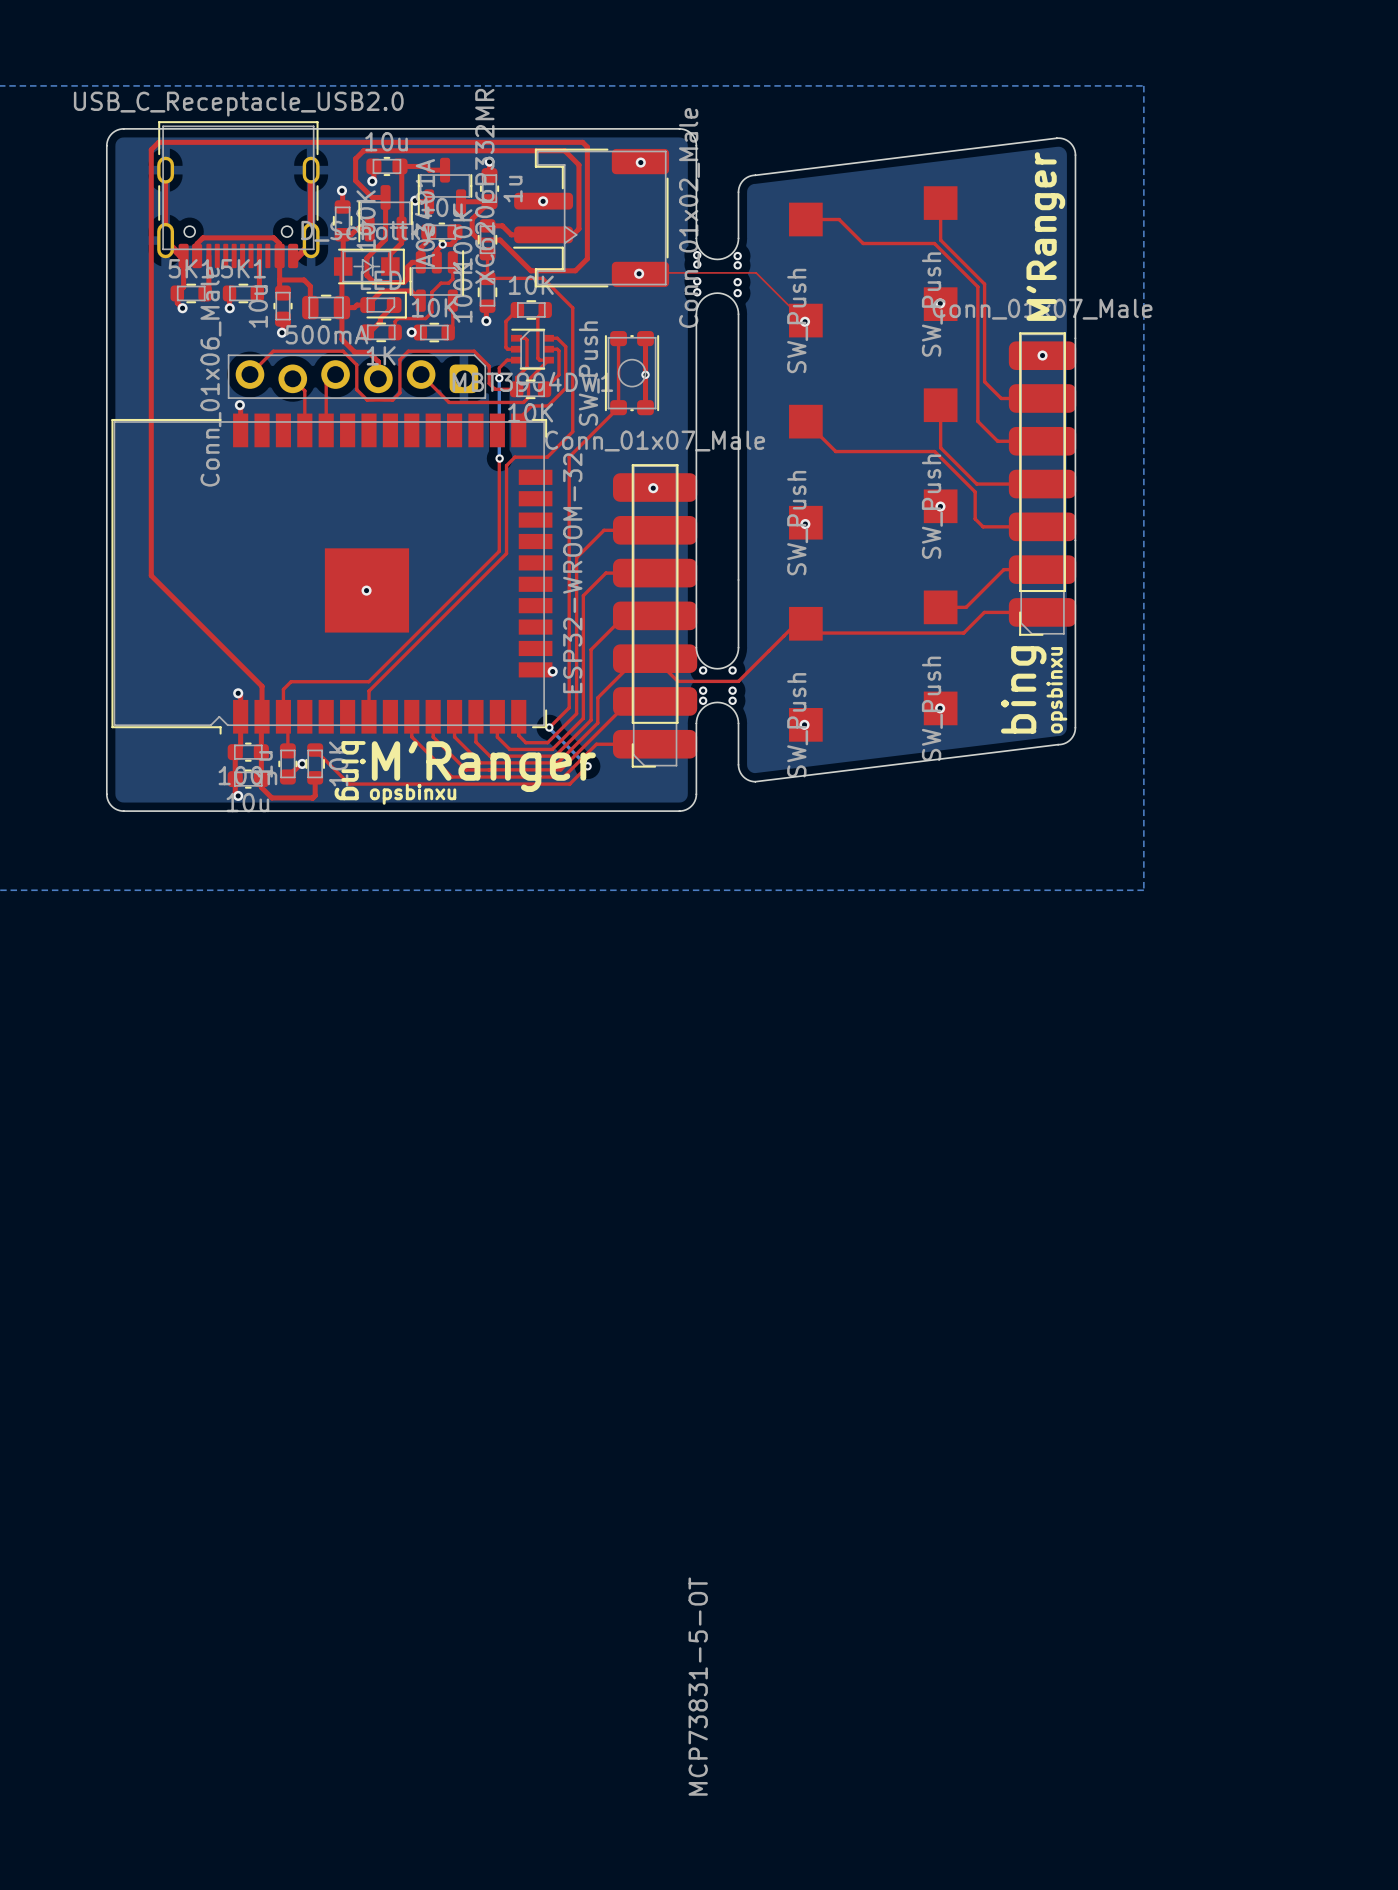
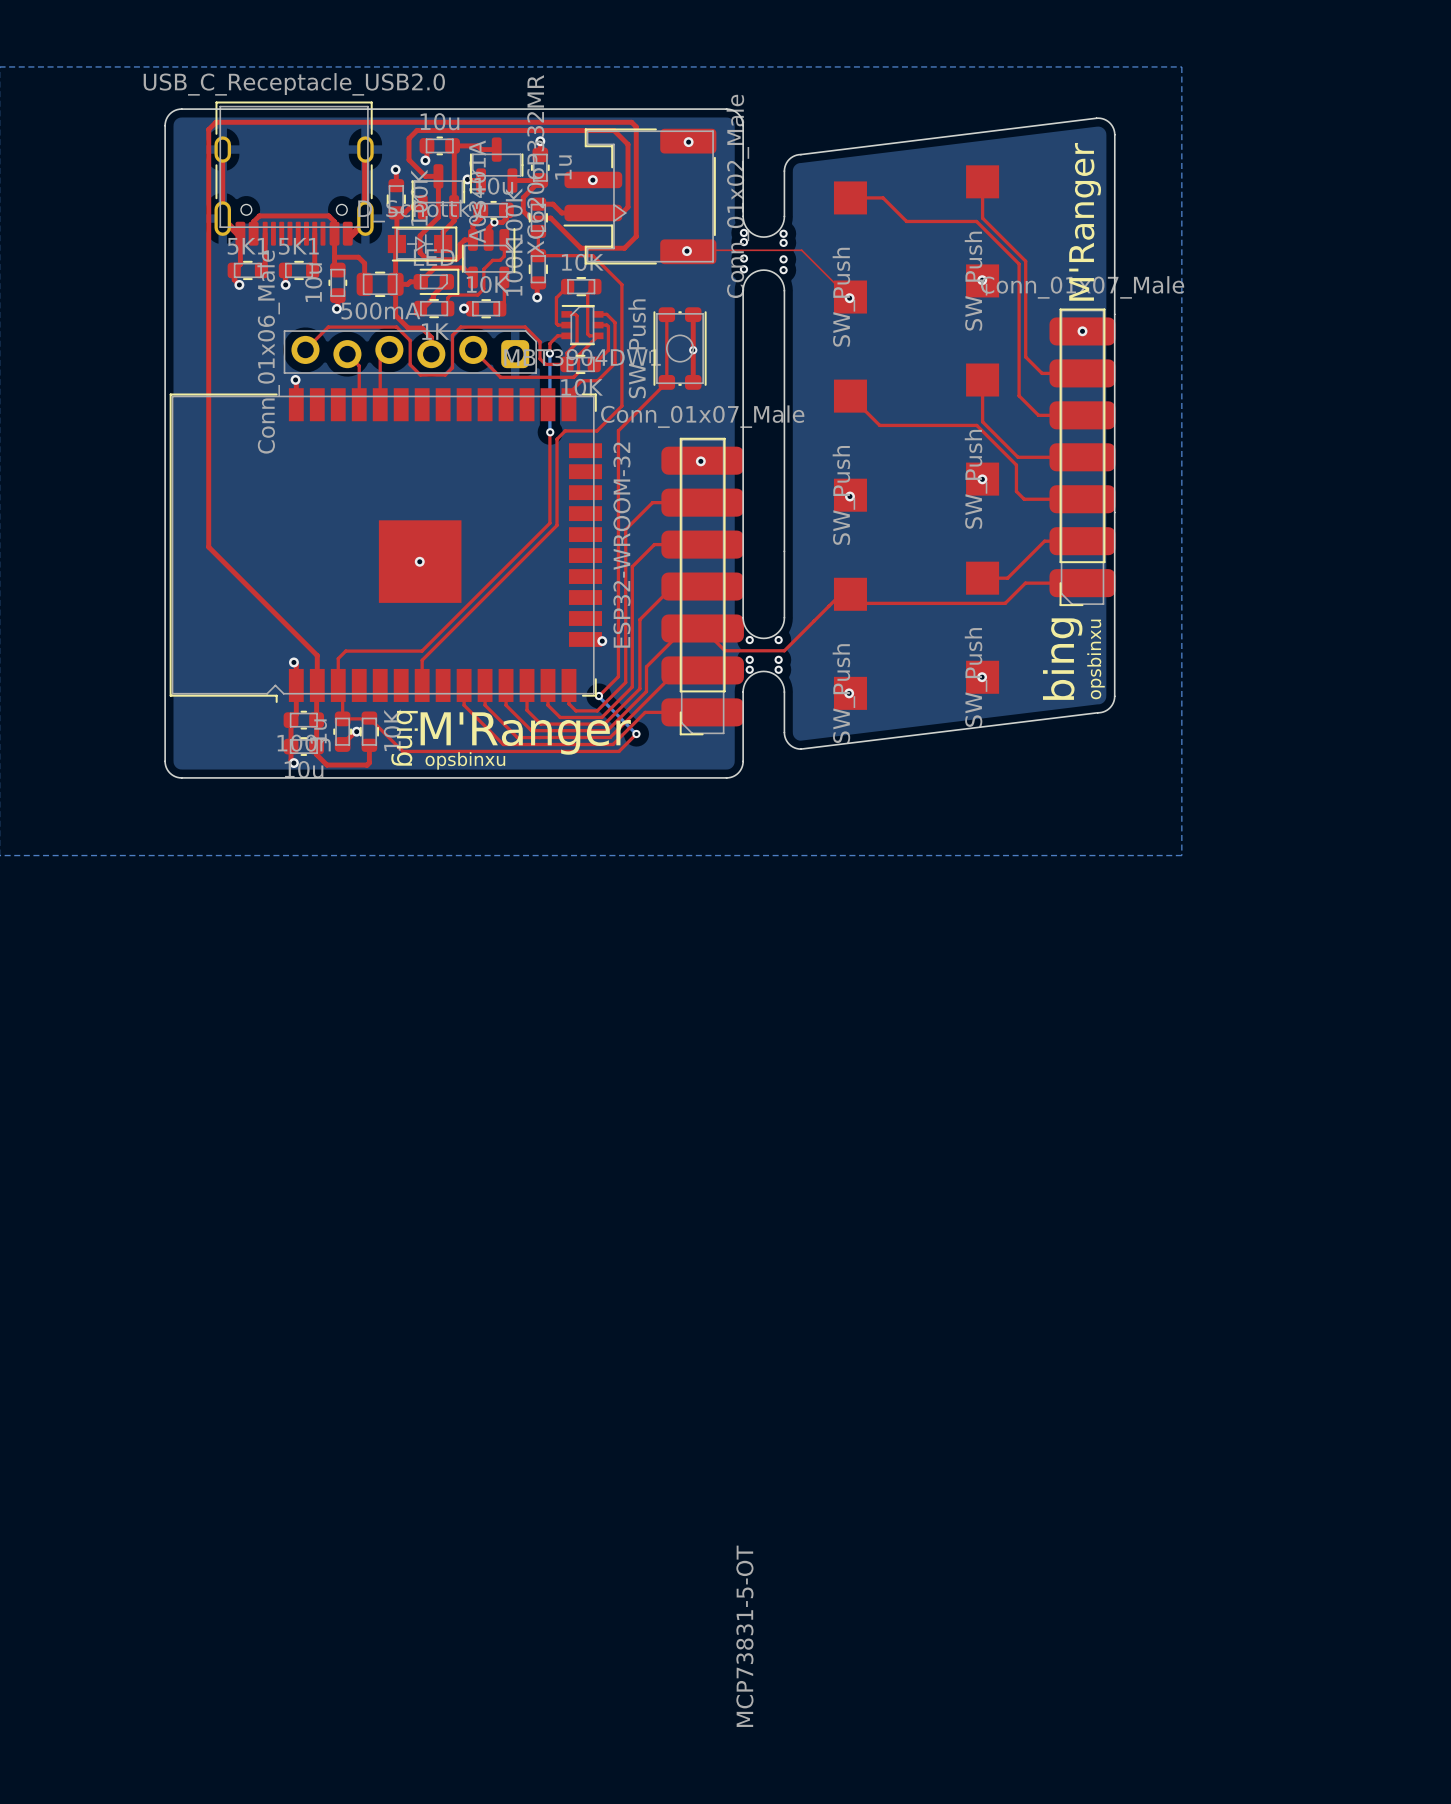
top track: none -> (369, 718) (342, 718)

